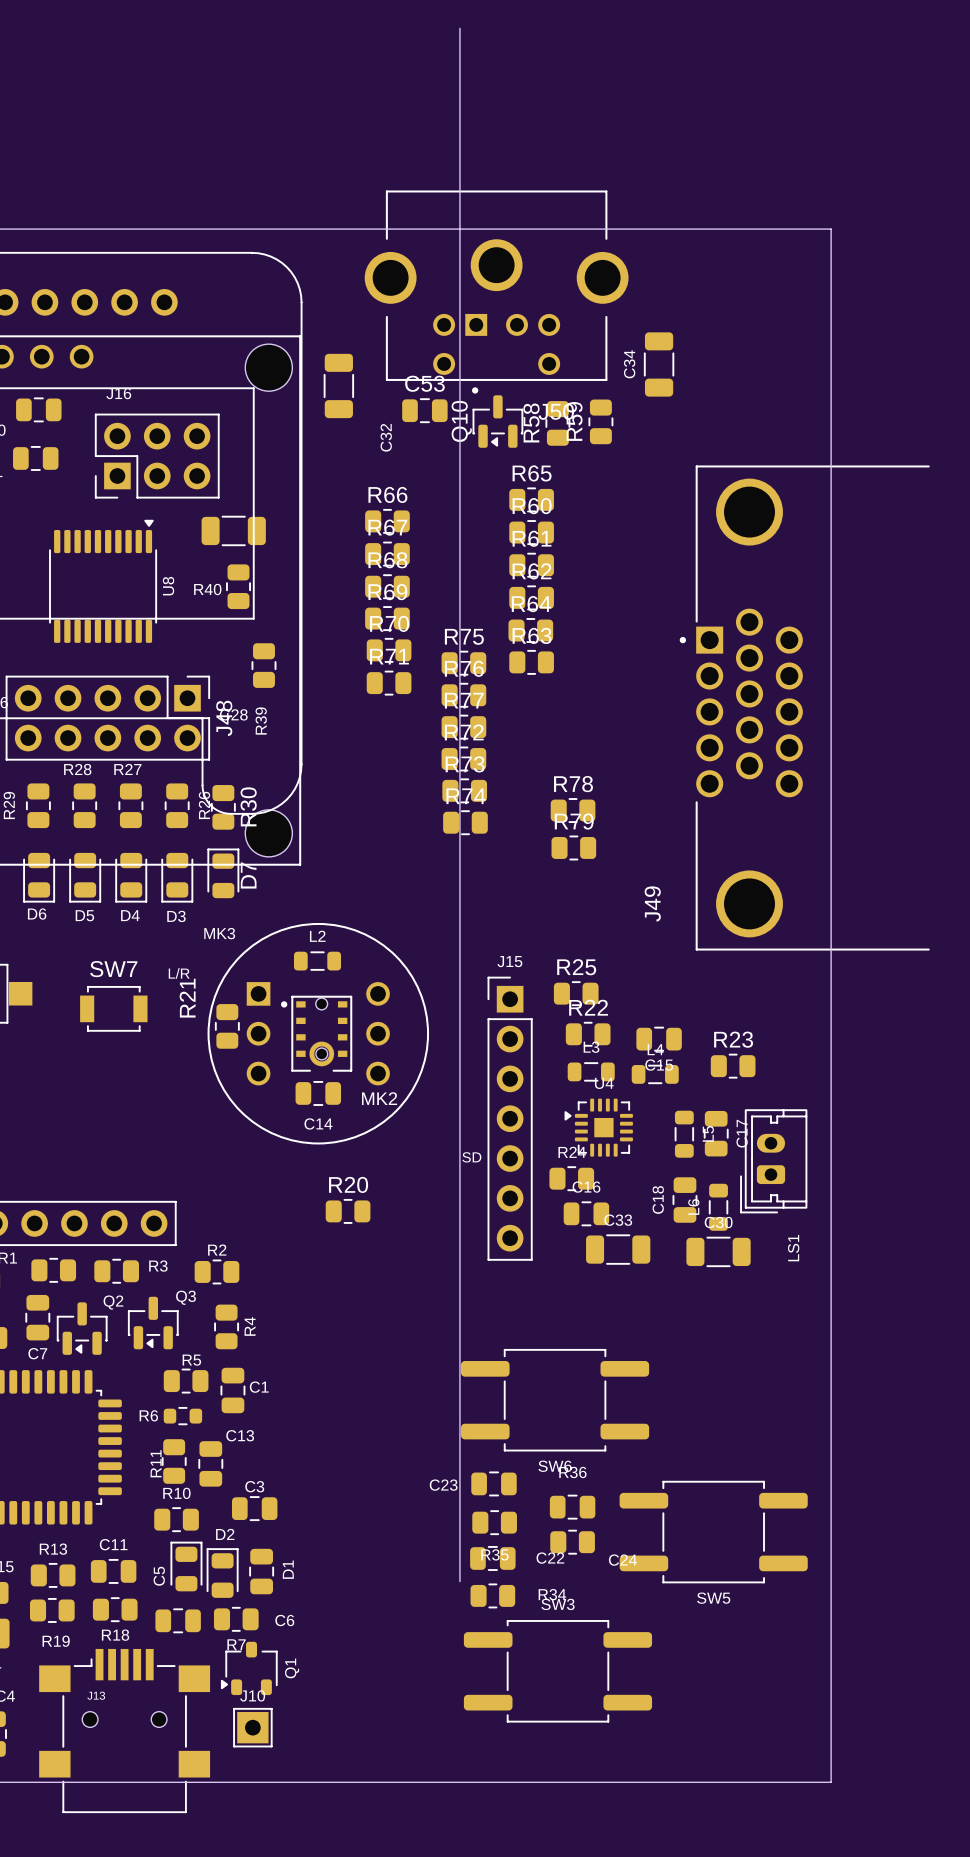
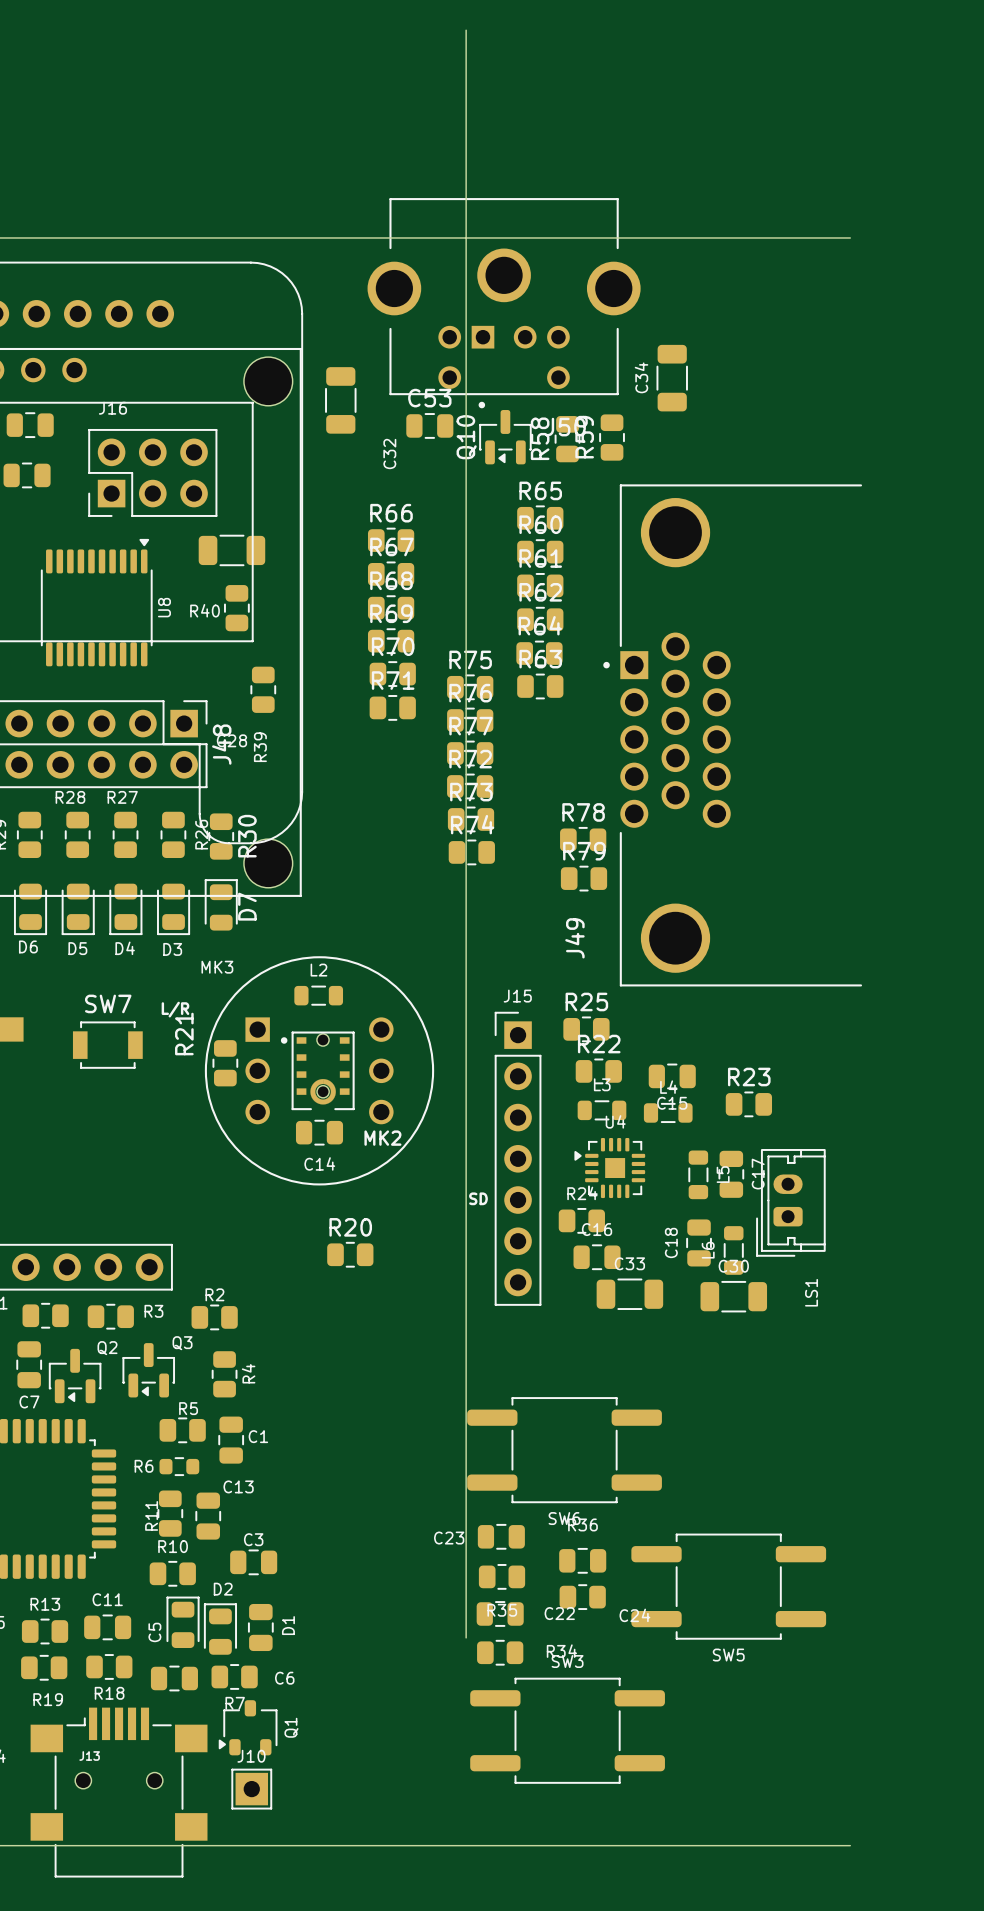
board edge: (831, 229) (831, 1782) -> none
J49 position: (804, 708) -> (732, 735)

